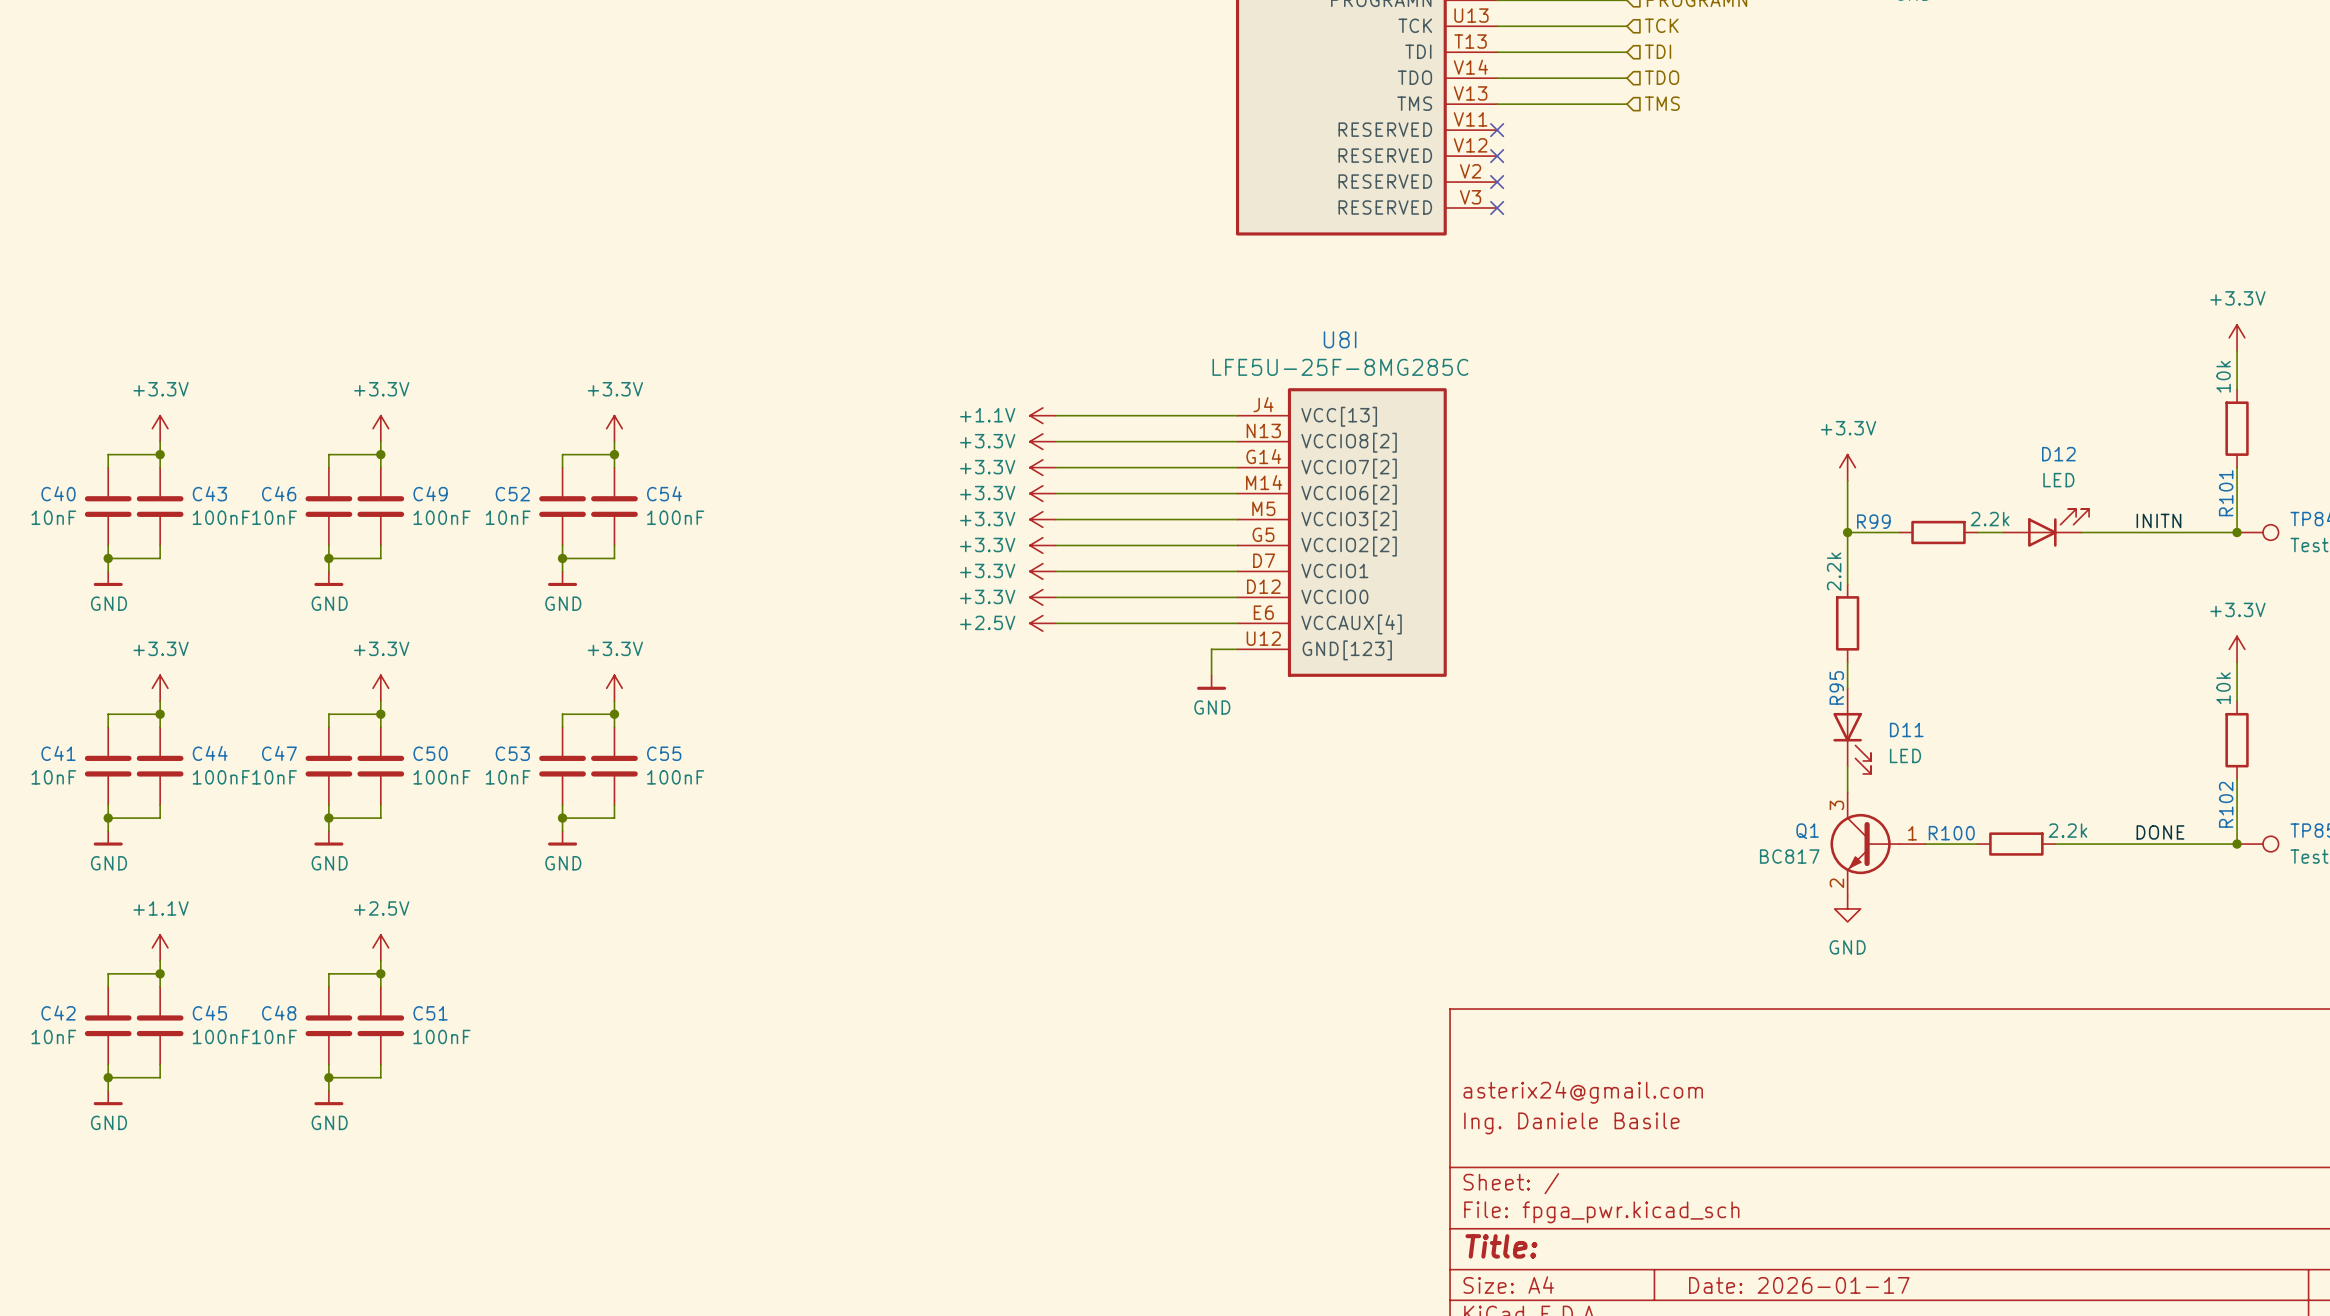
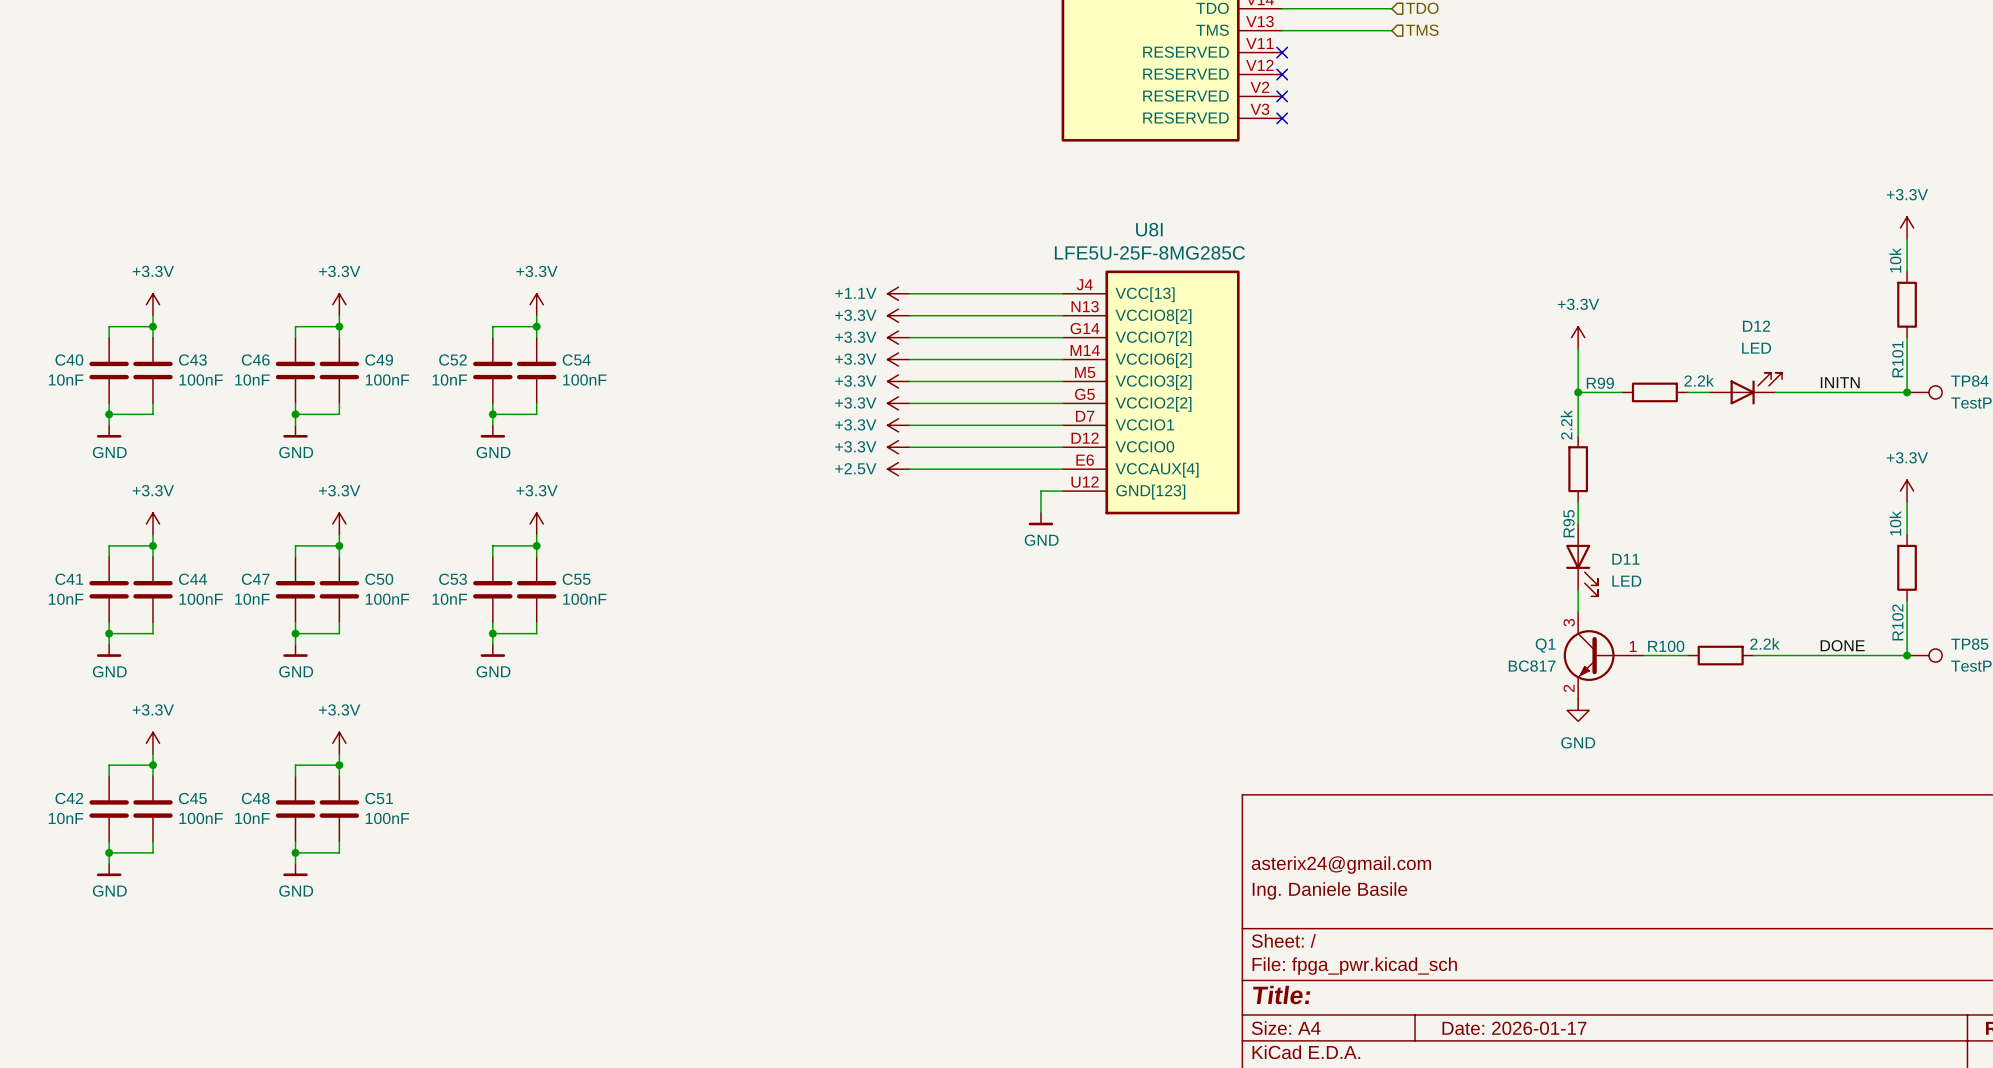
power symbol: +1.1V (160, 947) -> +3.3V (152, 743)
power symbol: +2.5V (380, 947) -> +3.3V (339, 743)

